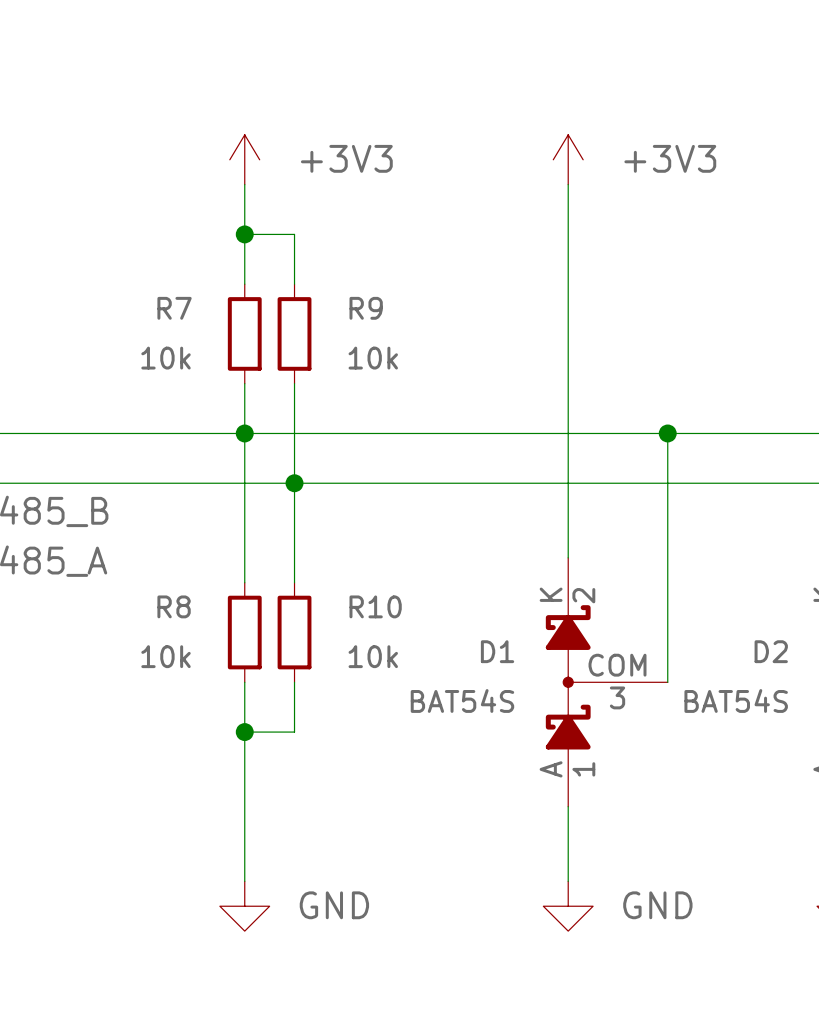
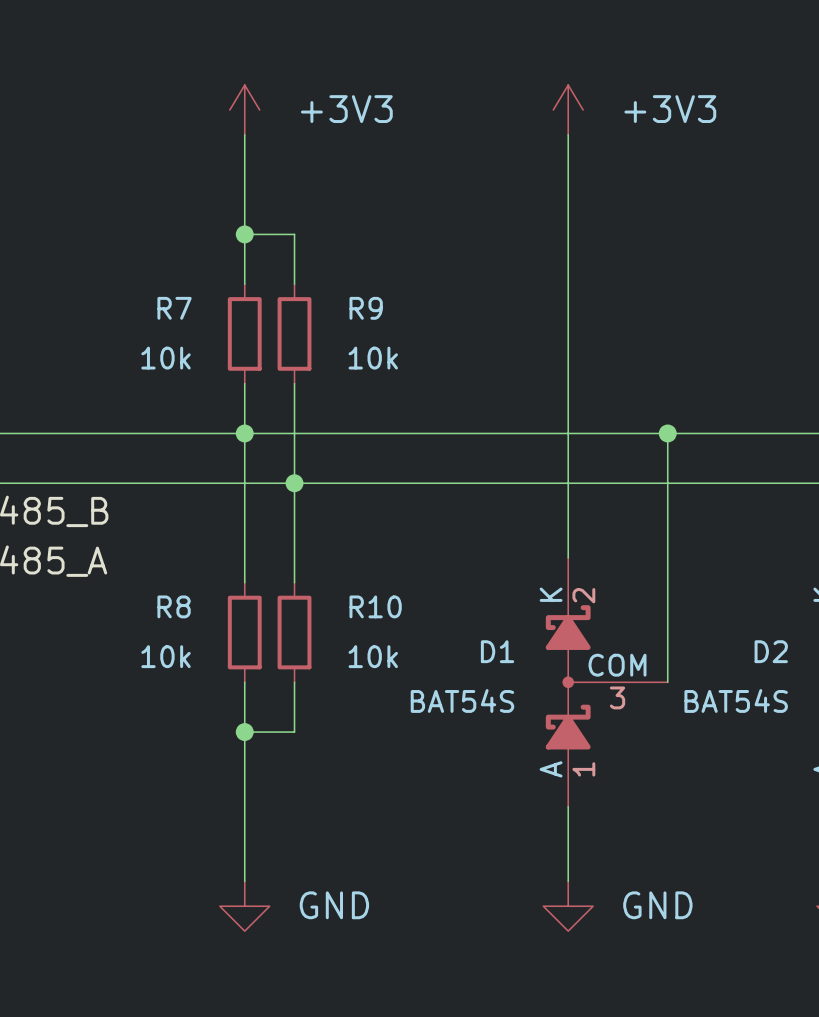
power symbol position: +3V3 (244, 159) -> +3V3 (244, 110)
power symbol position: +3V3 (568, 159) -> +3V3 (568, 110)

